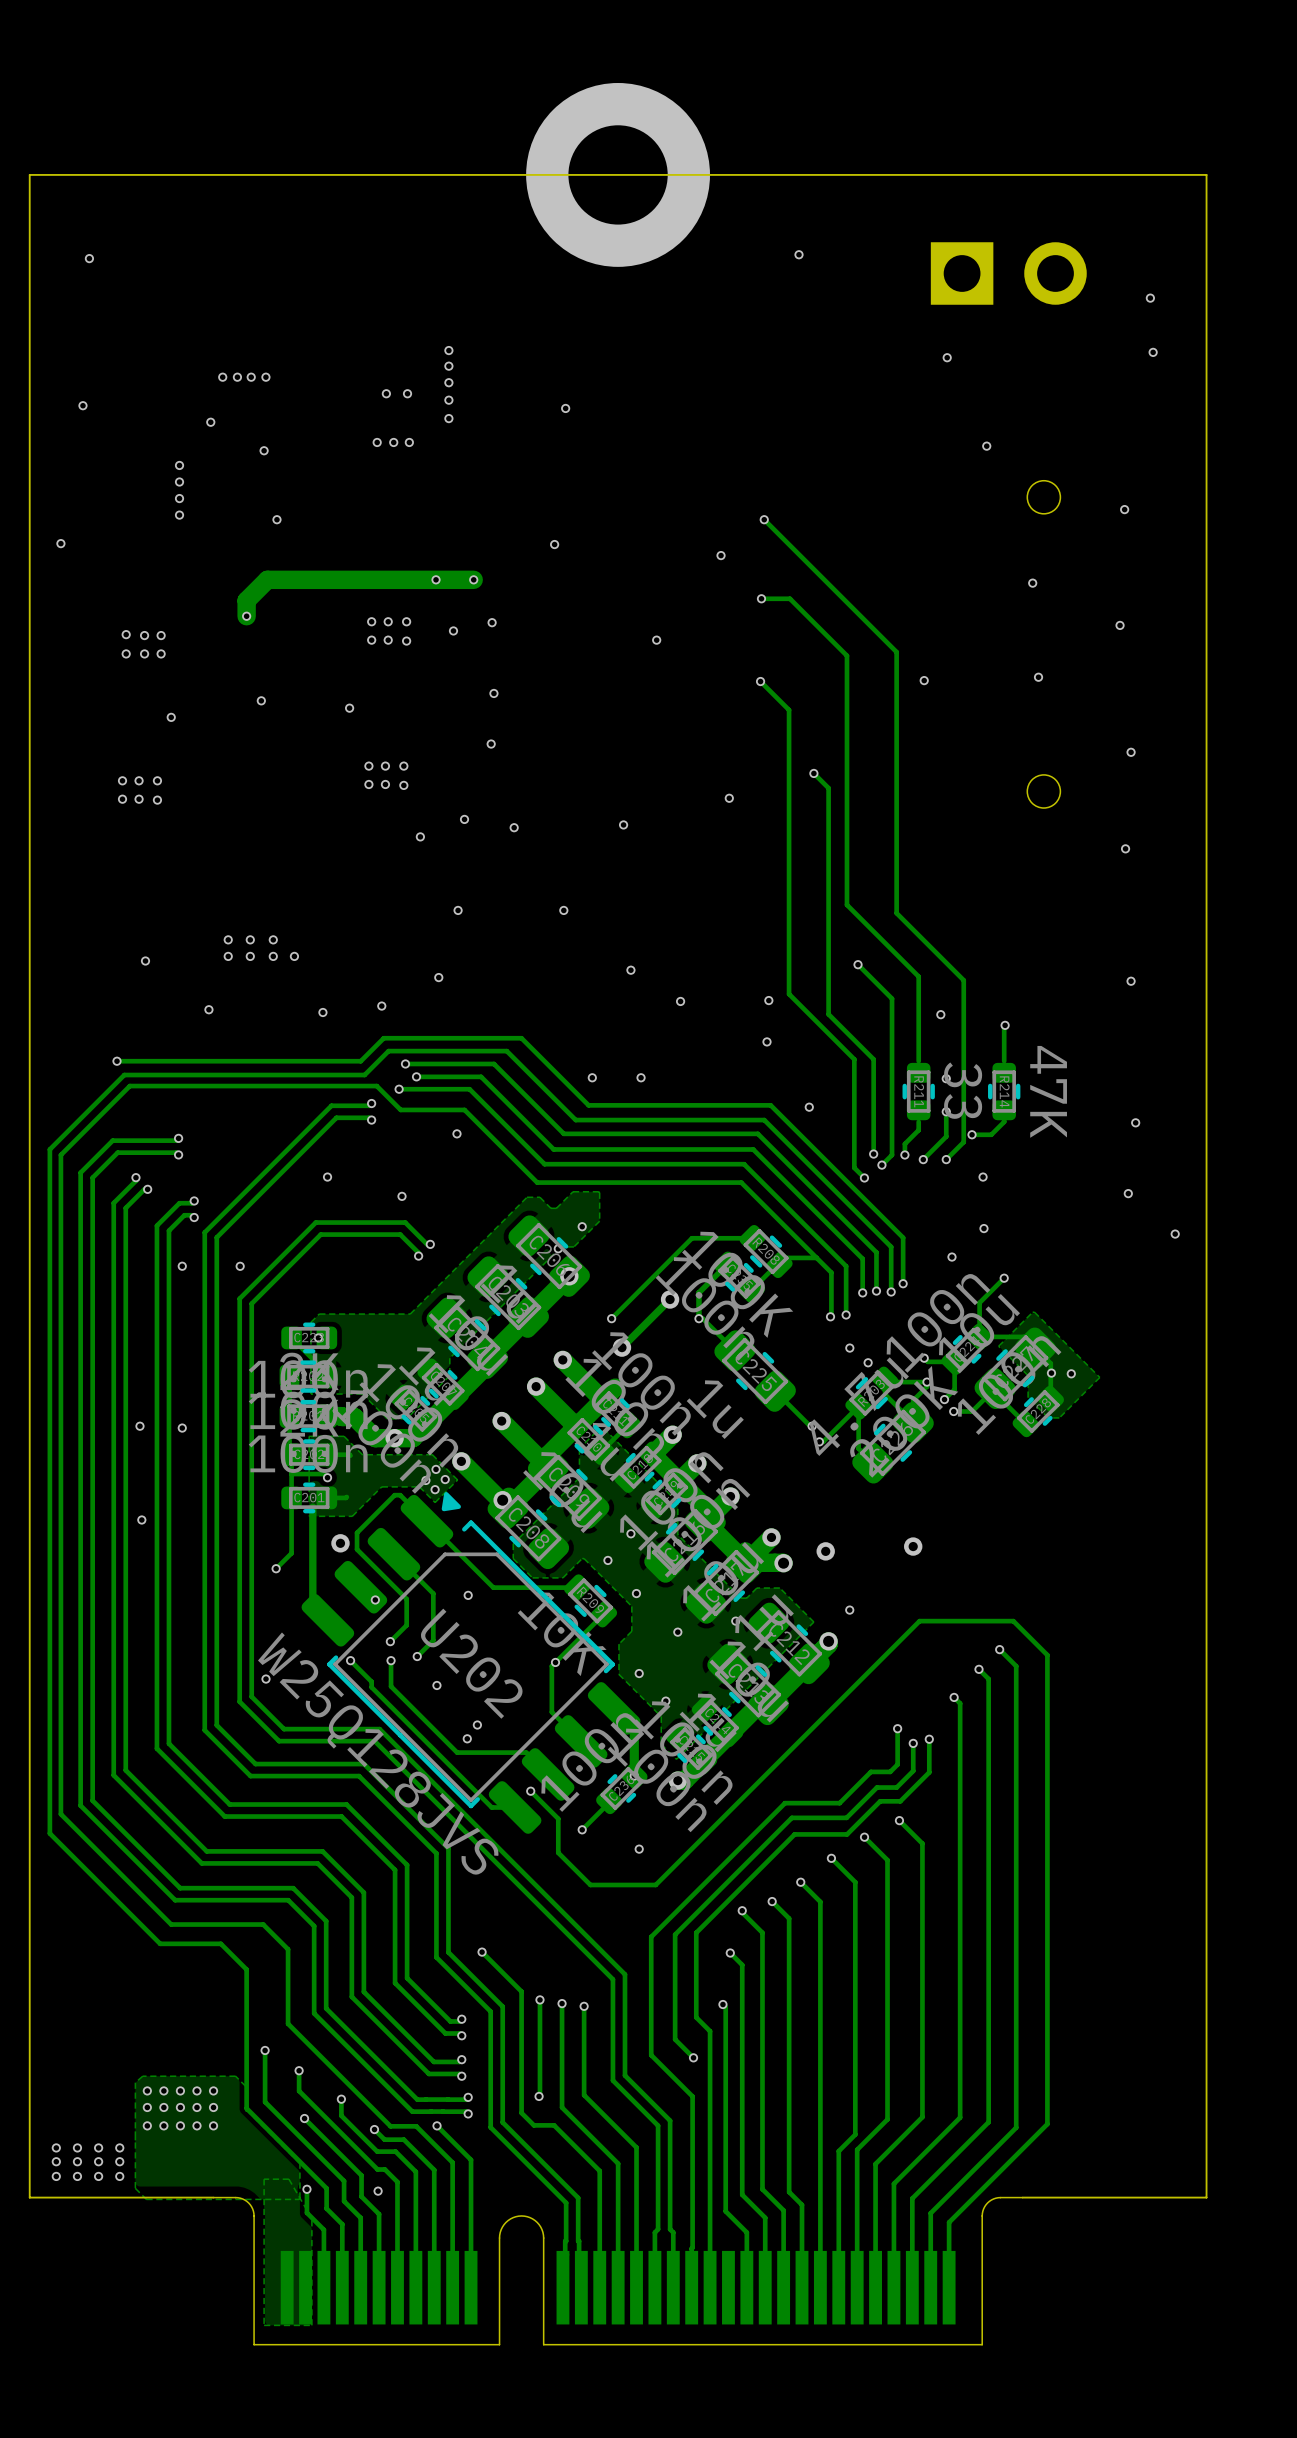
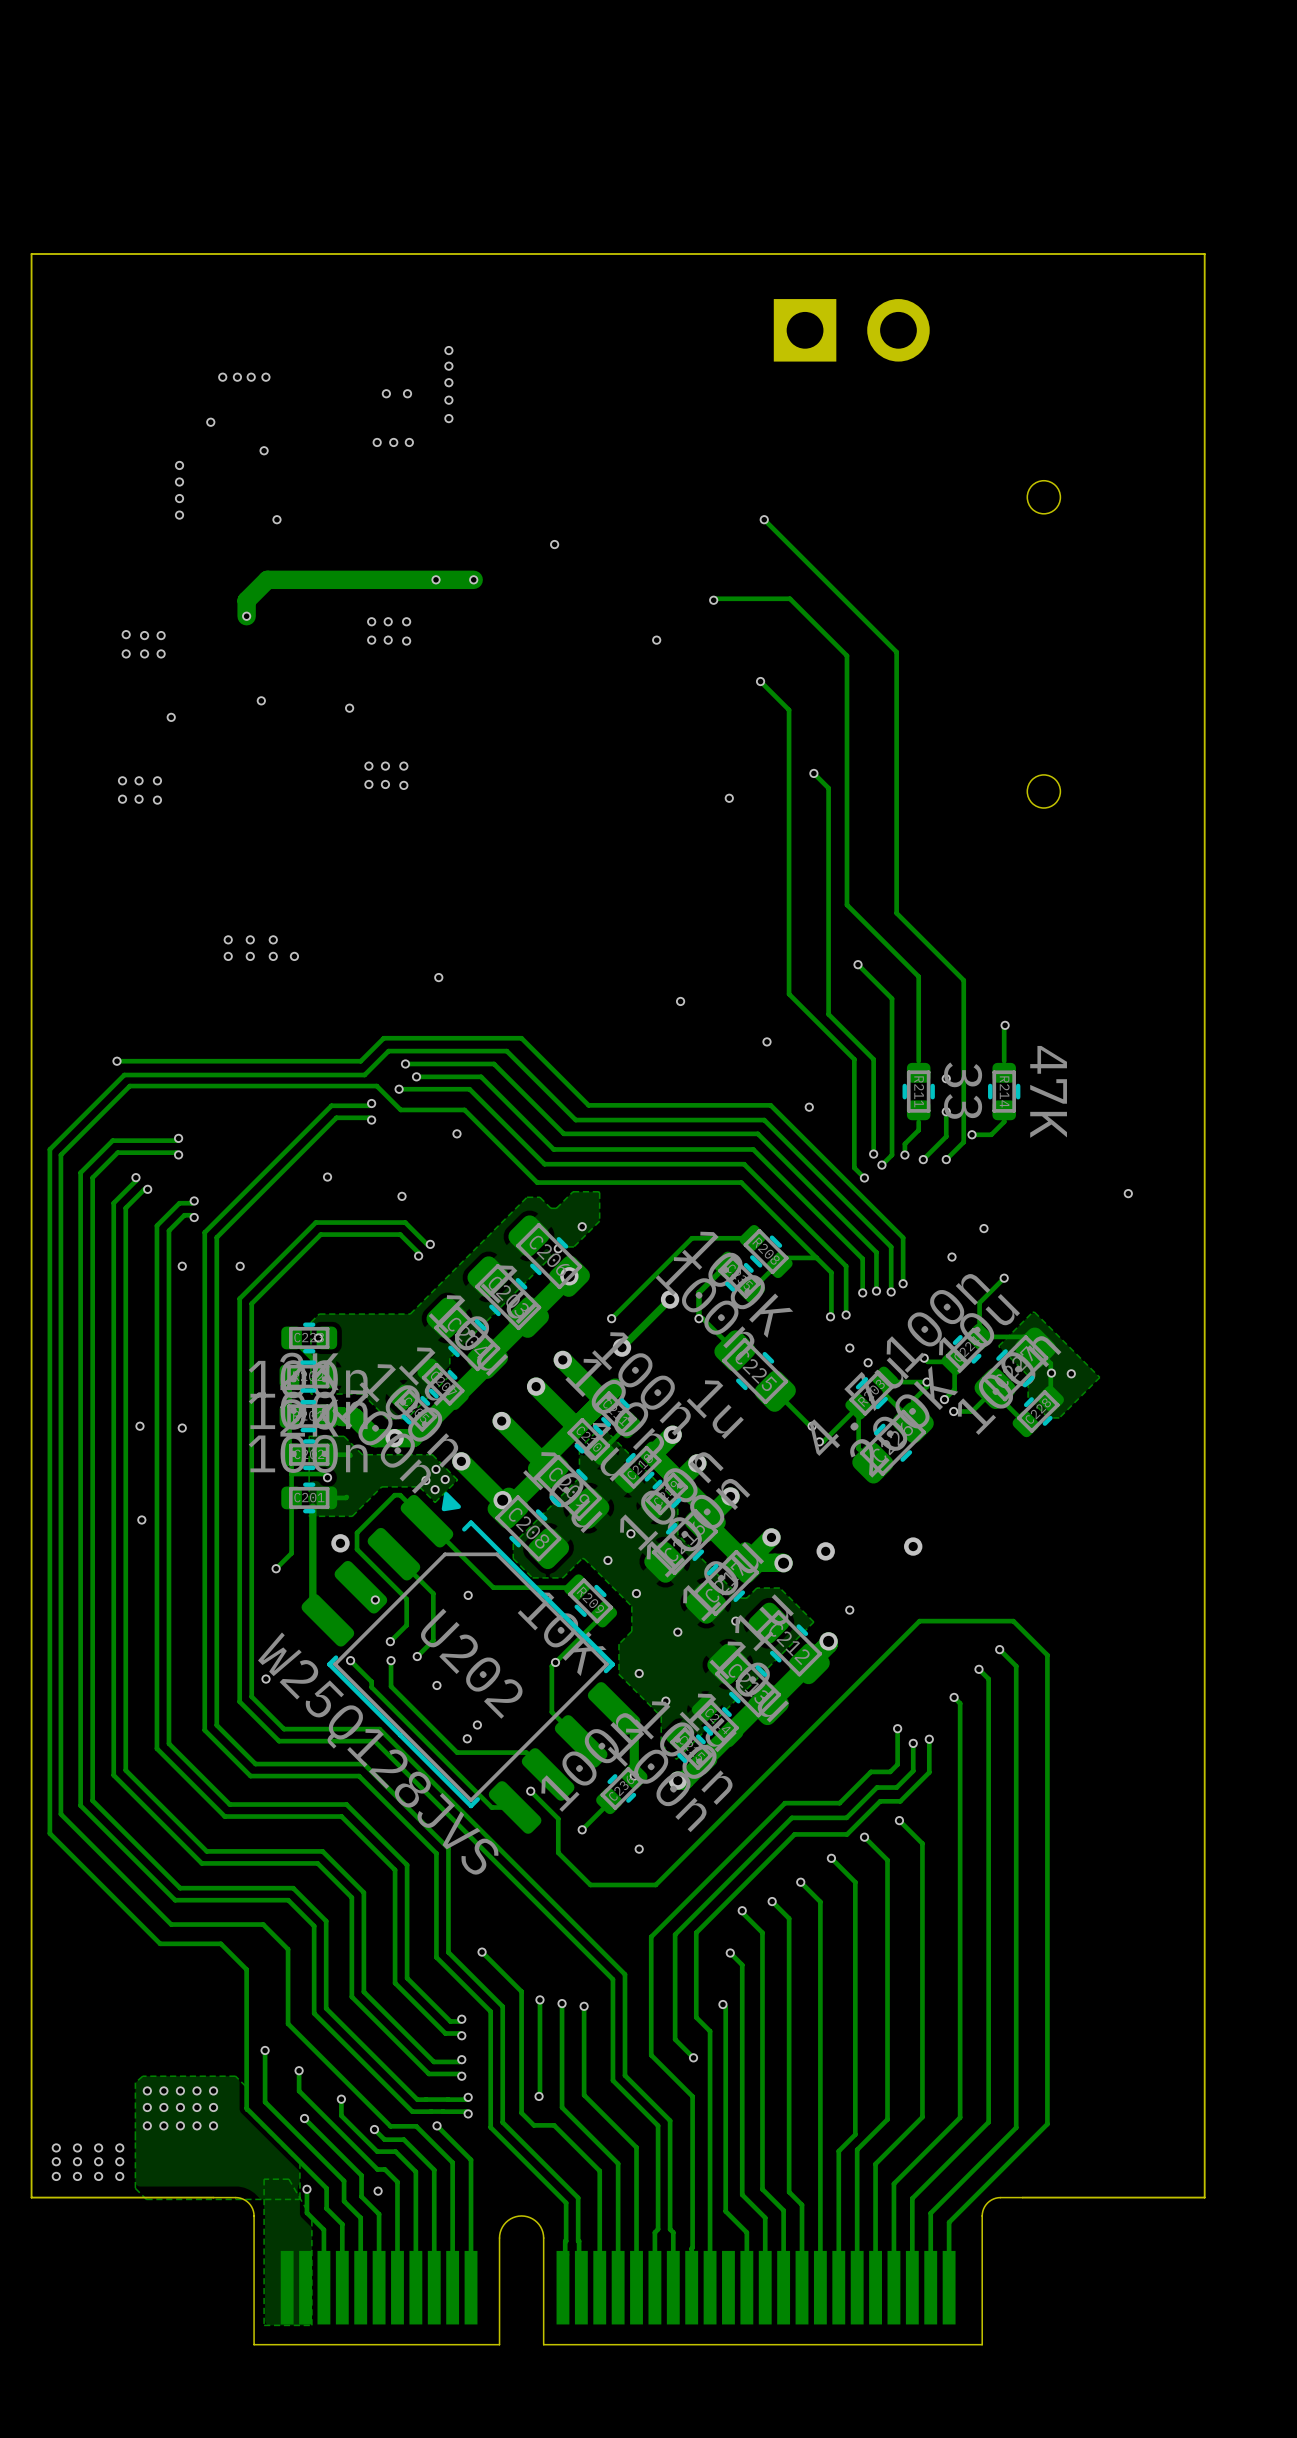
via: (618, 174) -> none
via: (798, 254) -> none
via: (89, 258) -> none
part position: (1008, 273) -> (851, 330)
via: (1150, 298) -> none
via: (1153, 352) -> none
via: (947, 357) -> none
via: (82, 405) -> none
via: (565, 408) -> none
via: (986, 446) -> none
via: (1124, 509) -> none
via: (60, 543) -> none
via: (721, 555) -> none
via: (1032, 583) -> none
track: none -> (761, 598) (713, 600)
via: (761, 598) -> none
via: none -> (713, 600)
via: (492, 622) -> none
via: (1120, 625) -> none
via: (453, 630) -> none
via: (1038, 677) -> none
via: (924, 680) -> none
via: (493, 693) -> none
via: (491, 744) -> none
via: (1131, 752) -> none
via: (464, 819) -> none
via: (623, 824) -> none
via: (514, 827) -> none
via: (420, 836) -> none
via: (1125, 848) -> none
via: (458, 910) -> none
via: (563, 910) -> none
via: (145, 961) -> none
via: (630, 970) -> none
via: (1131, 981) -> none
via: (768, 1000) -> none
via: (381, 1006) -> none
via: (208, 1009) -> none
via: (322, 1012) -> none
via: (940, 1014) -> none
via: (592, 1077) -> none
via: (641, 1077) -> none
via: (1135, 1122) -> none
via: (983, 1177) -> none
via: (1175, 1234) -> none
board edge: (1204, 2197) (1206, 2197) (1206, 174) (29, 174) (29, 2197) (31, 2197) -> (1204, 2197) (1204, 254) (31, 254) (31, 2197)

